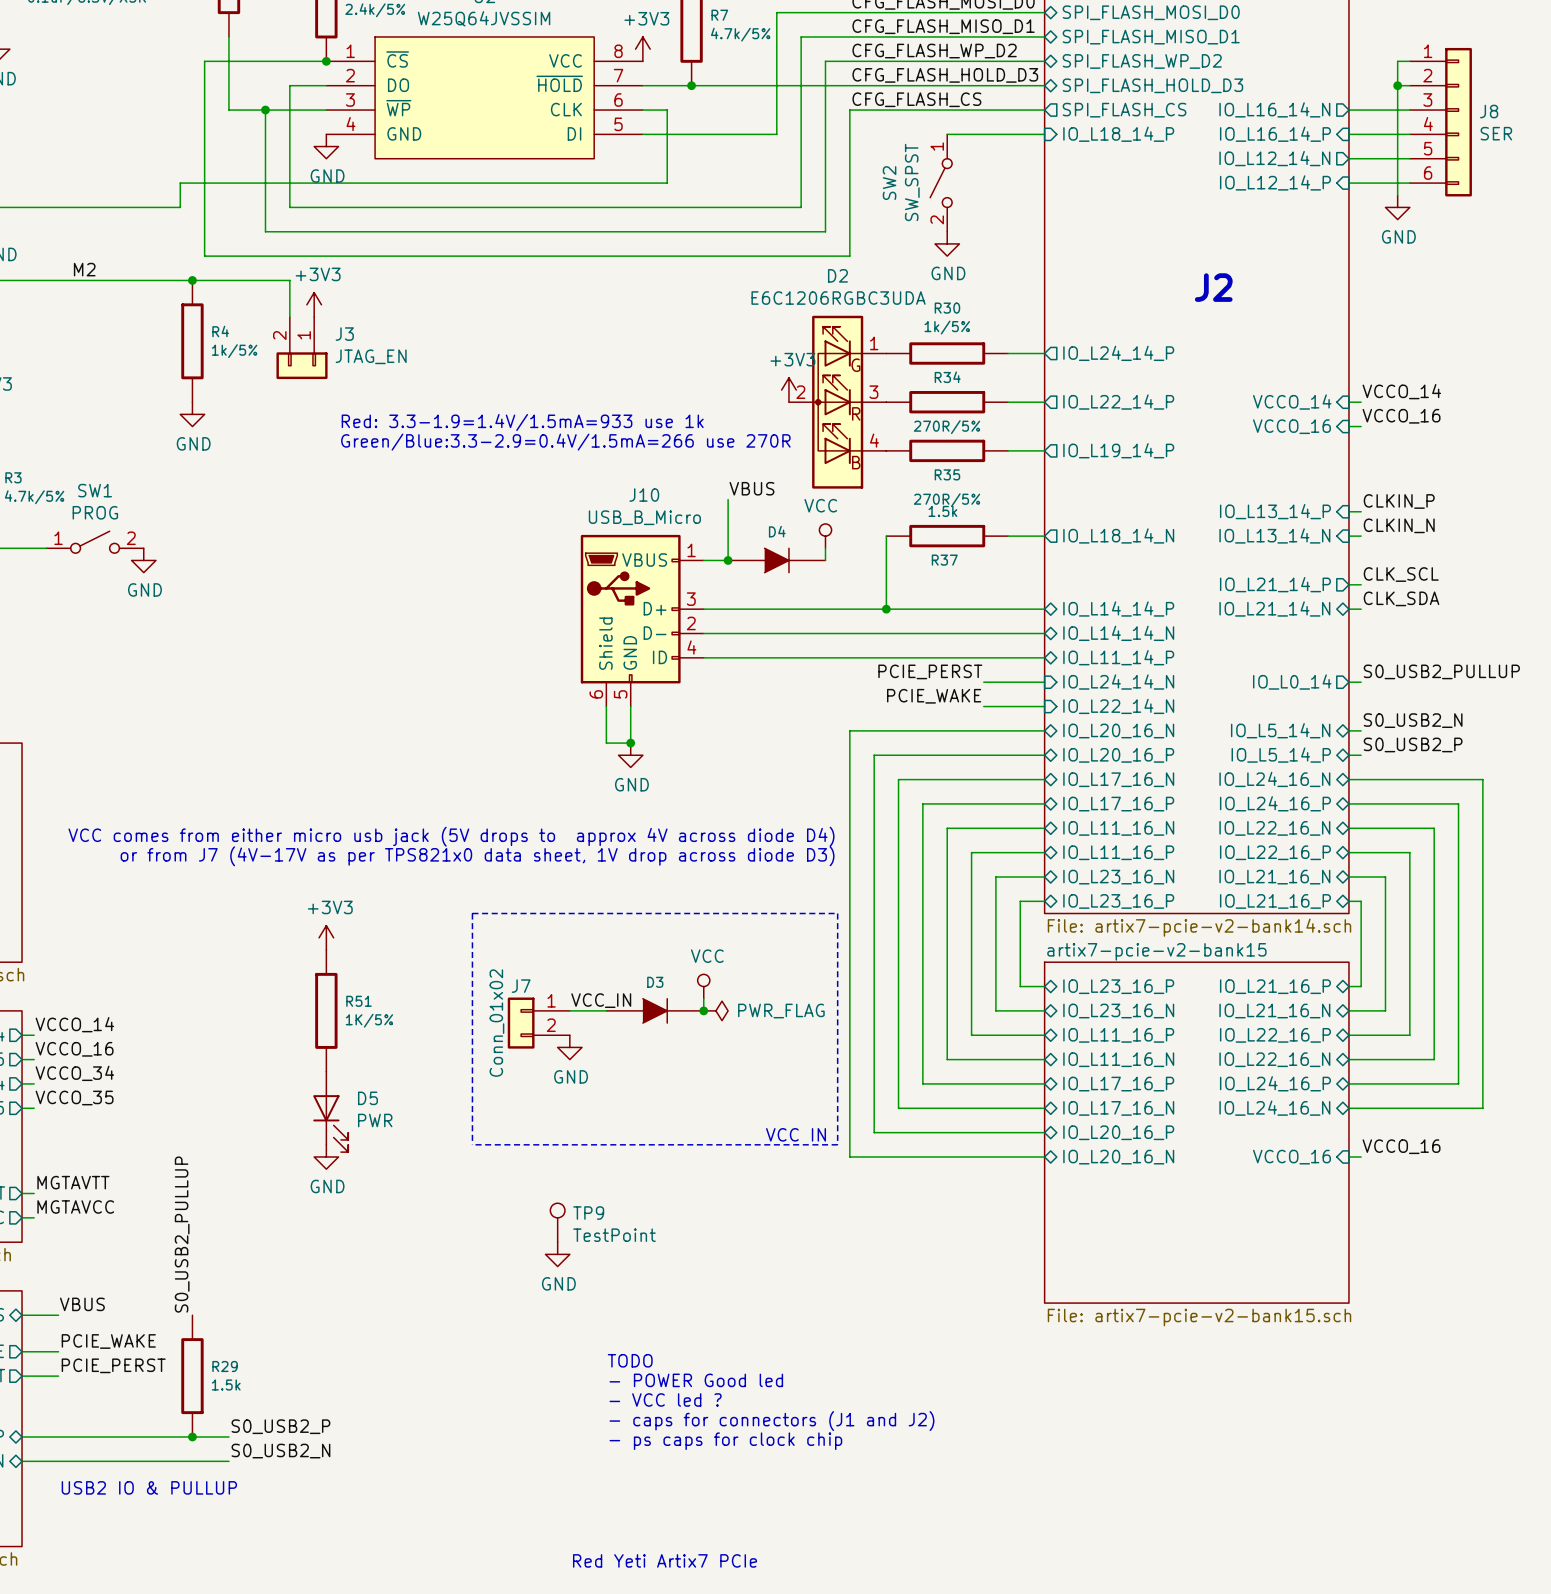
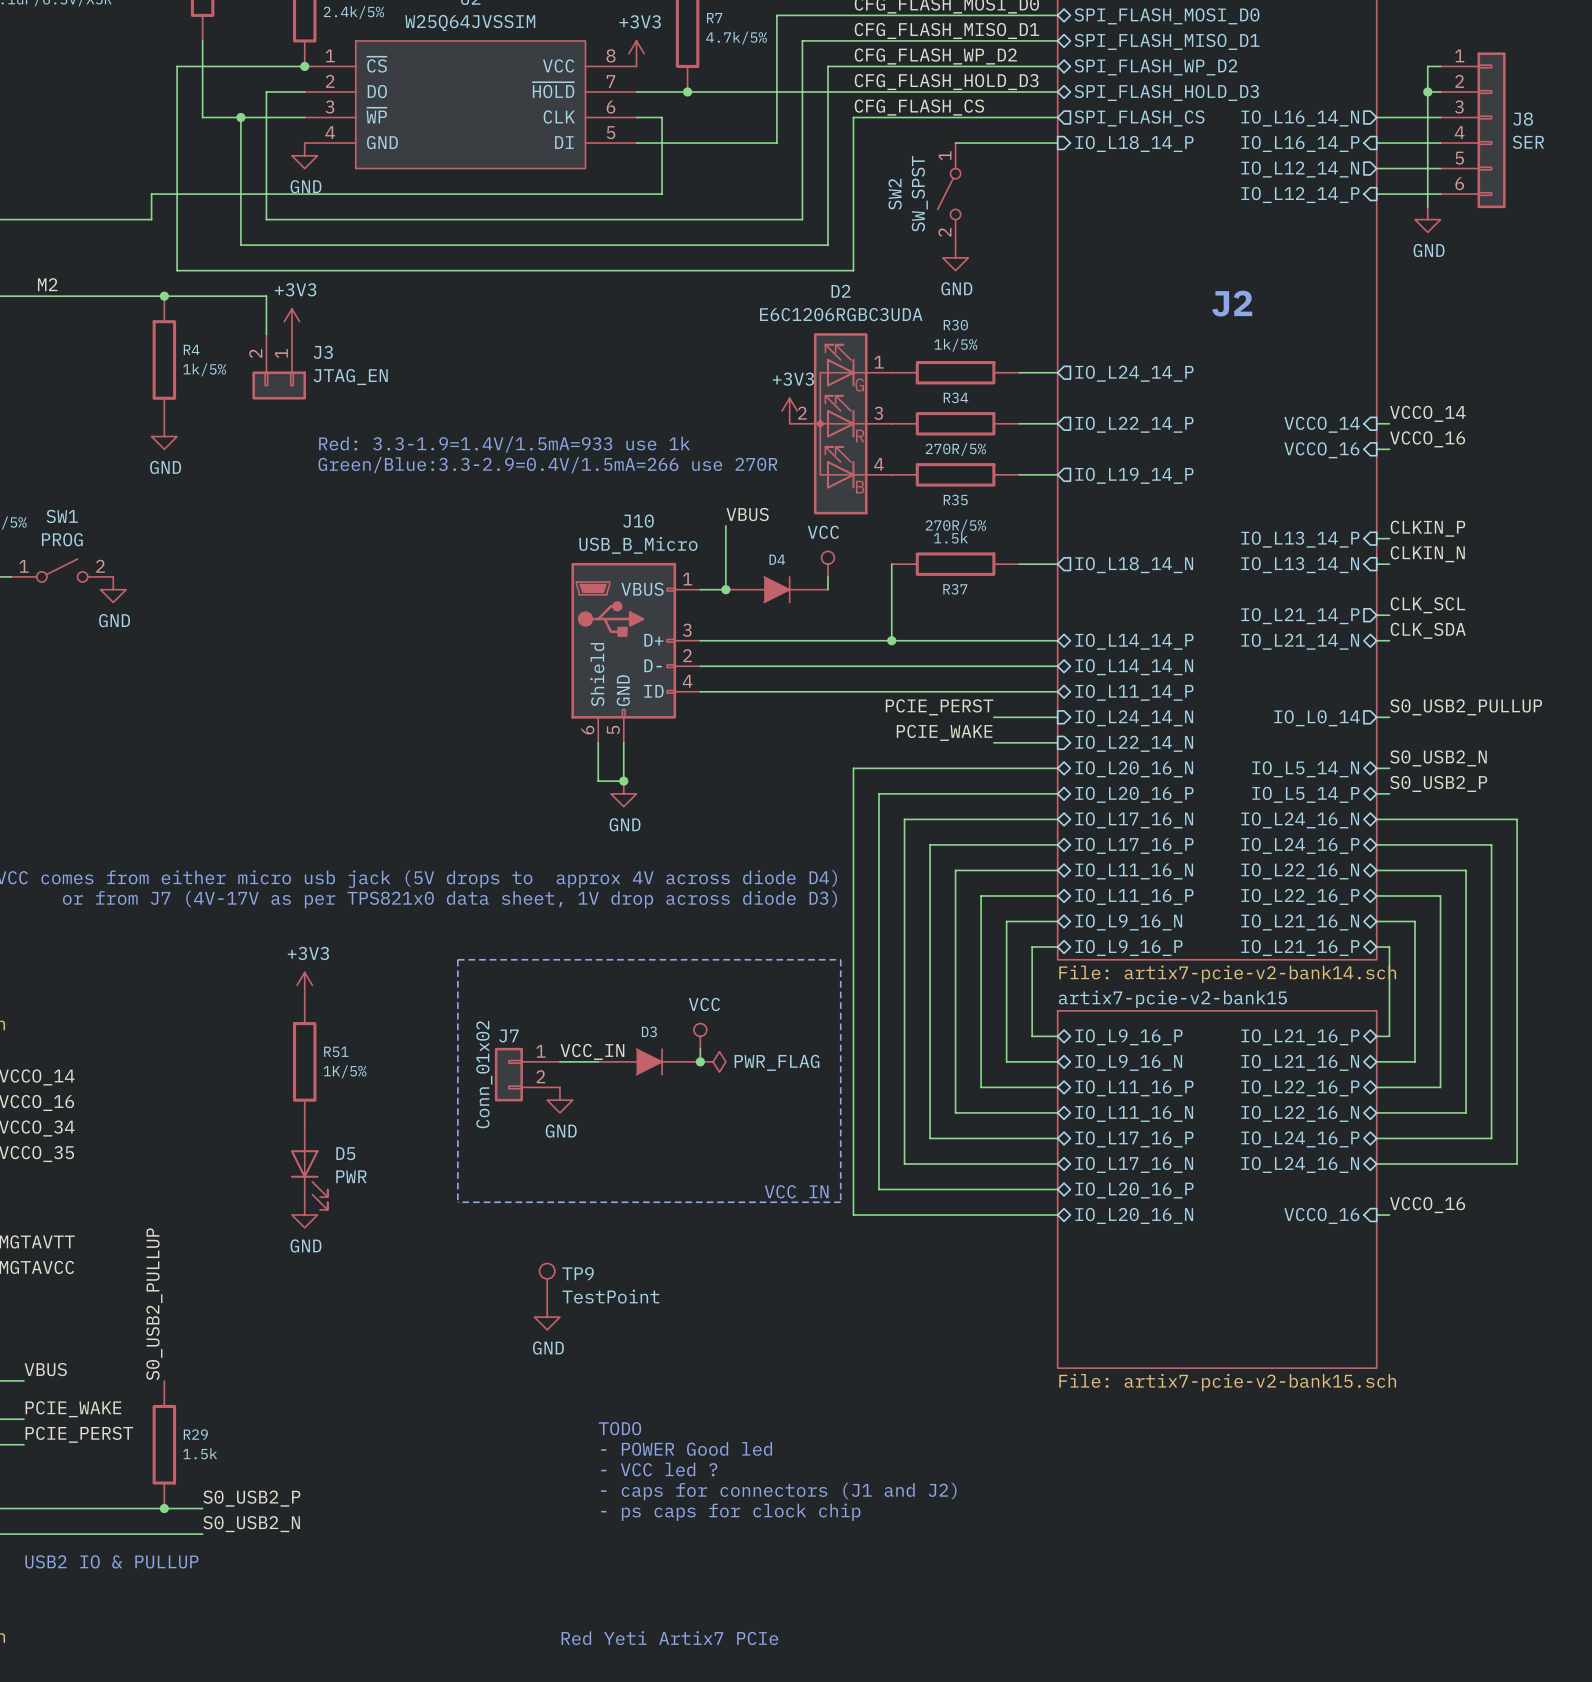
sheet pin: IO_L23_16_N (1118, 877) -> IO_L9_16_N (1128, 922)
sheet pin: IO_L23_16_P (1118, 901) -> IO_L9_16_P (1128, 947)
sheet pin: IO_L23_16_P (1118, 986) -> IO_L9_16_P (1128, 1037)
sheet pin: IO_L23_16_N (1118, 1011) -> IO_L9_16_N (1128, 1062)

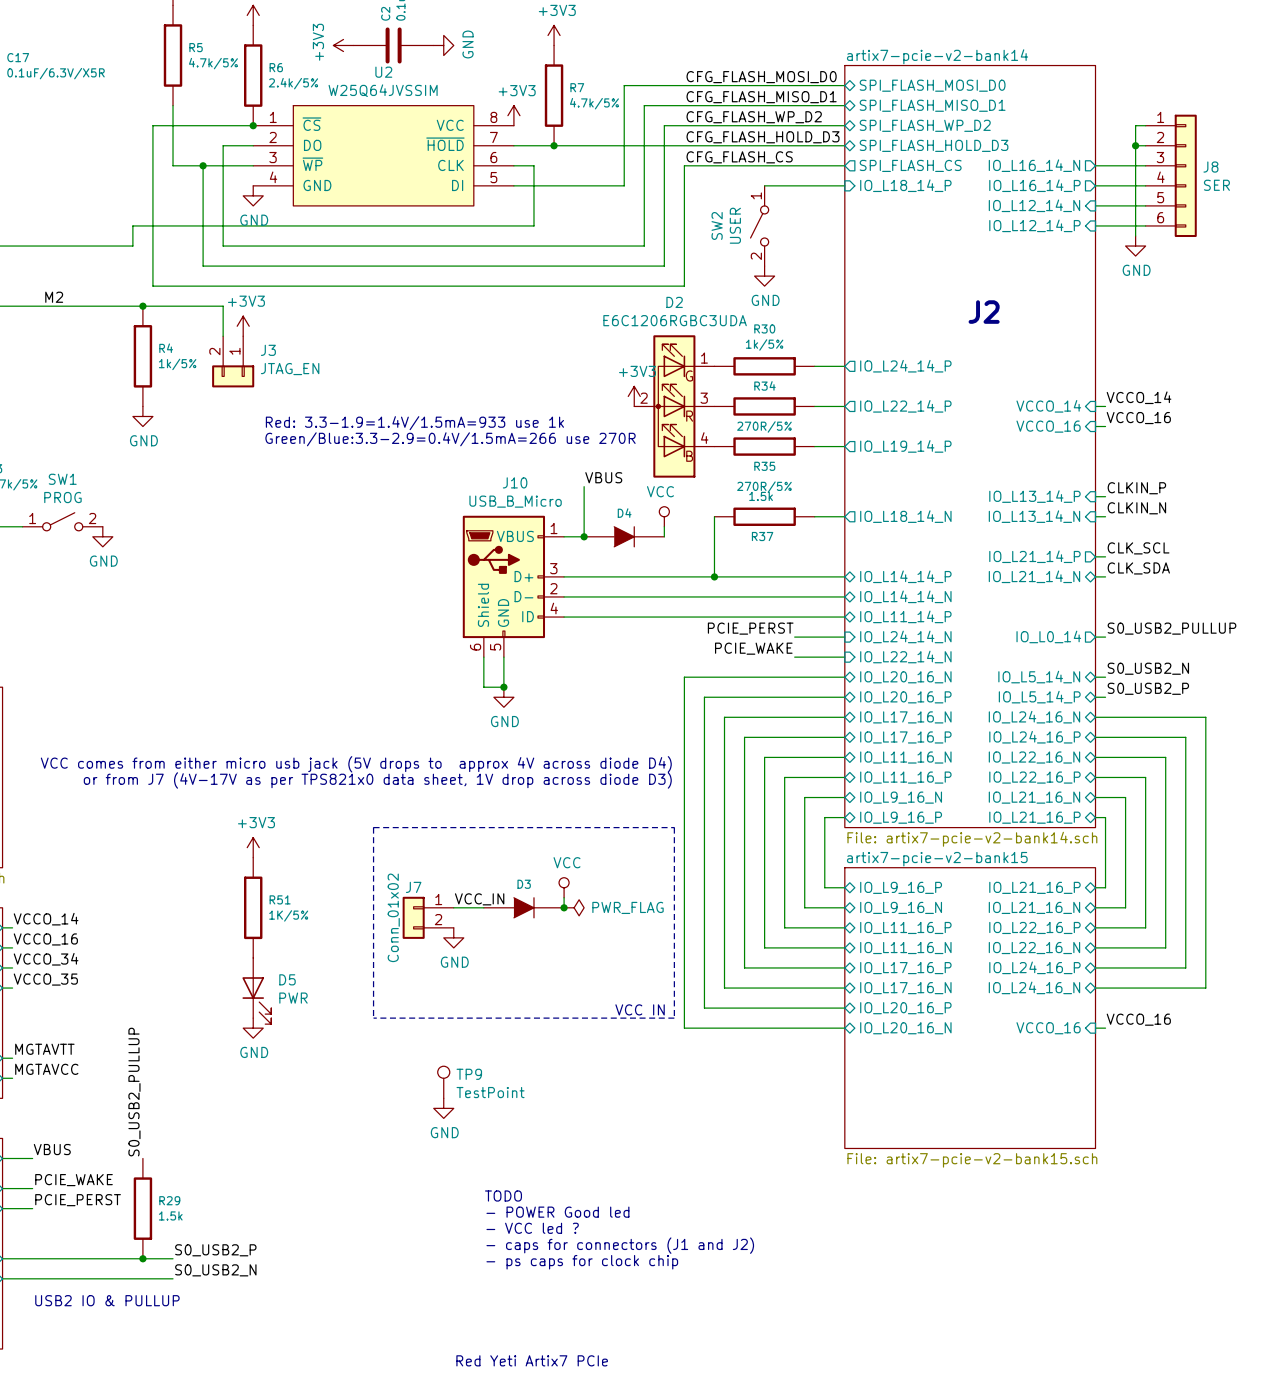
sheet pin shape: input (1300, 143) -> output (1034, 185)
sheet pin shape: output (1300, 169) -> input (1034, 205)
SW2 value: SW_SPST (919, 193) -> USER (735, 225)

